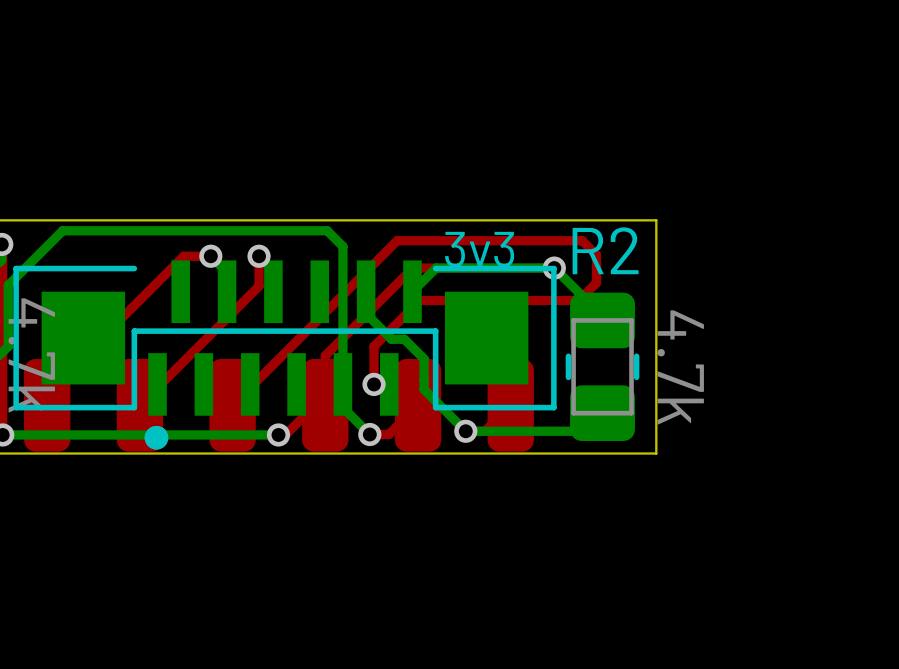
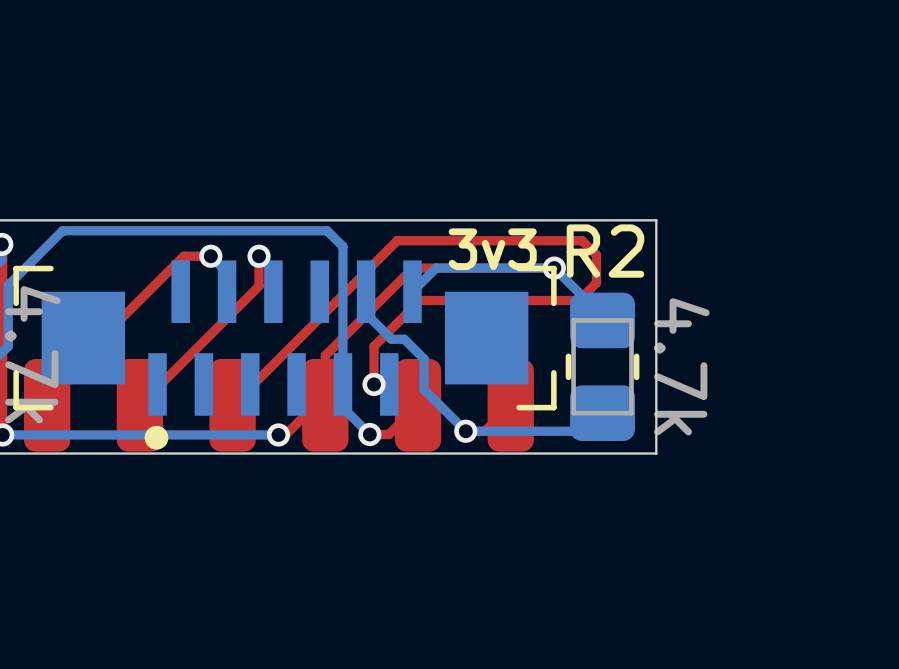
part footprint: [13, 260, 557, 450] -> [13, 260, 557, 450]

